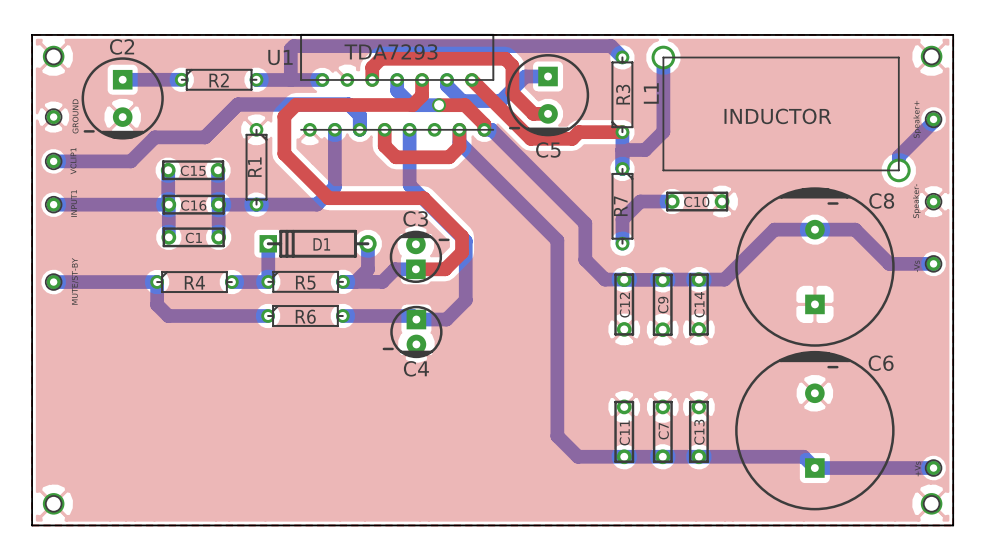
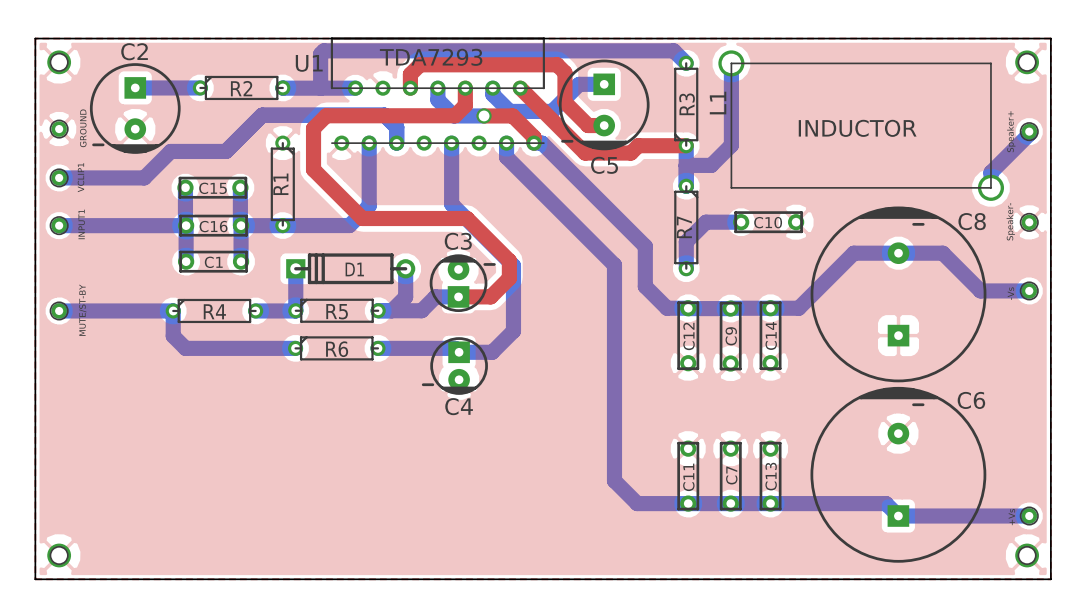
top track: (384, 129) (384, 145) (396, 157) (449, 157) (459, 146) (459, 129) -> none

